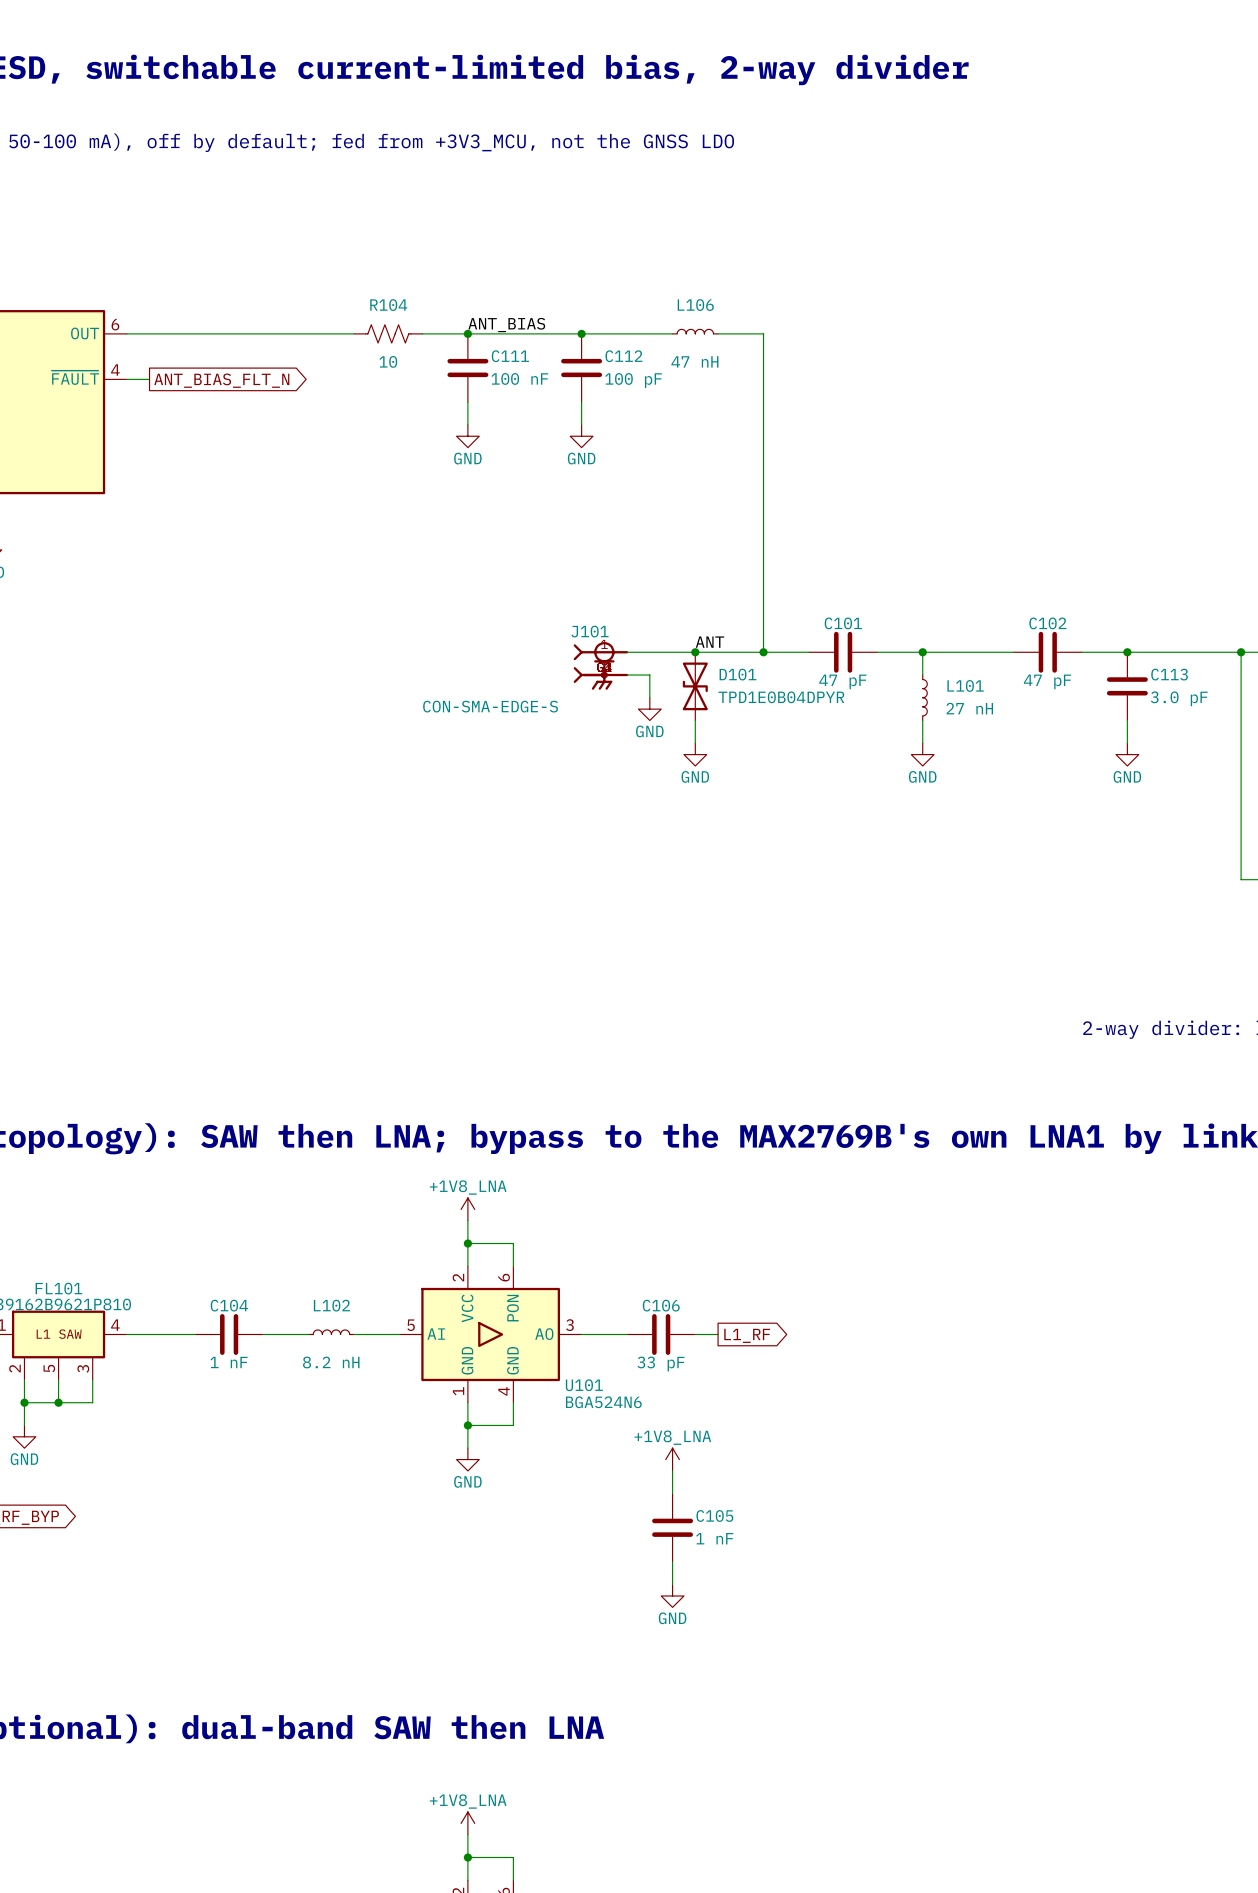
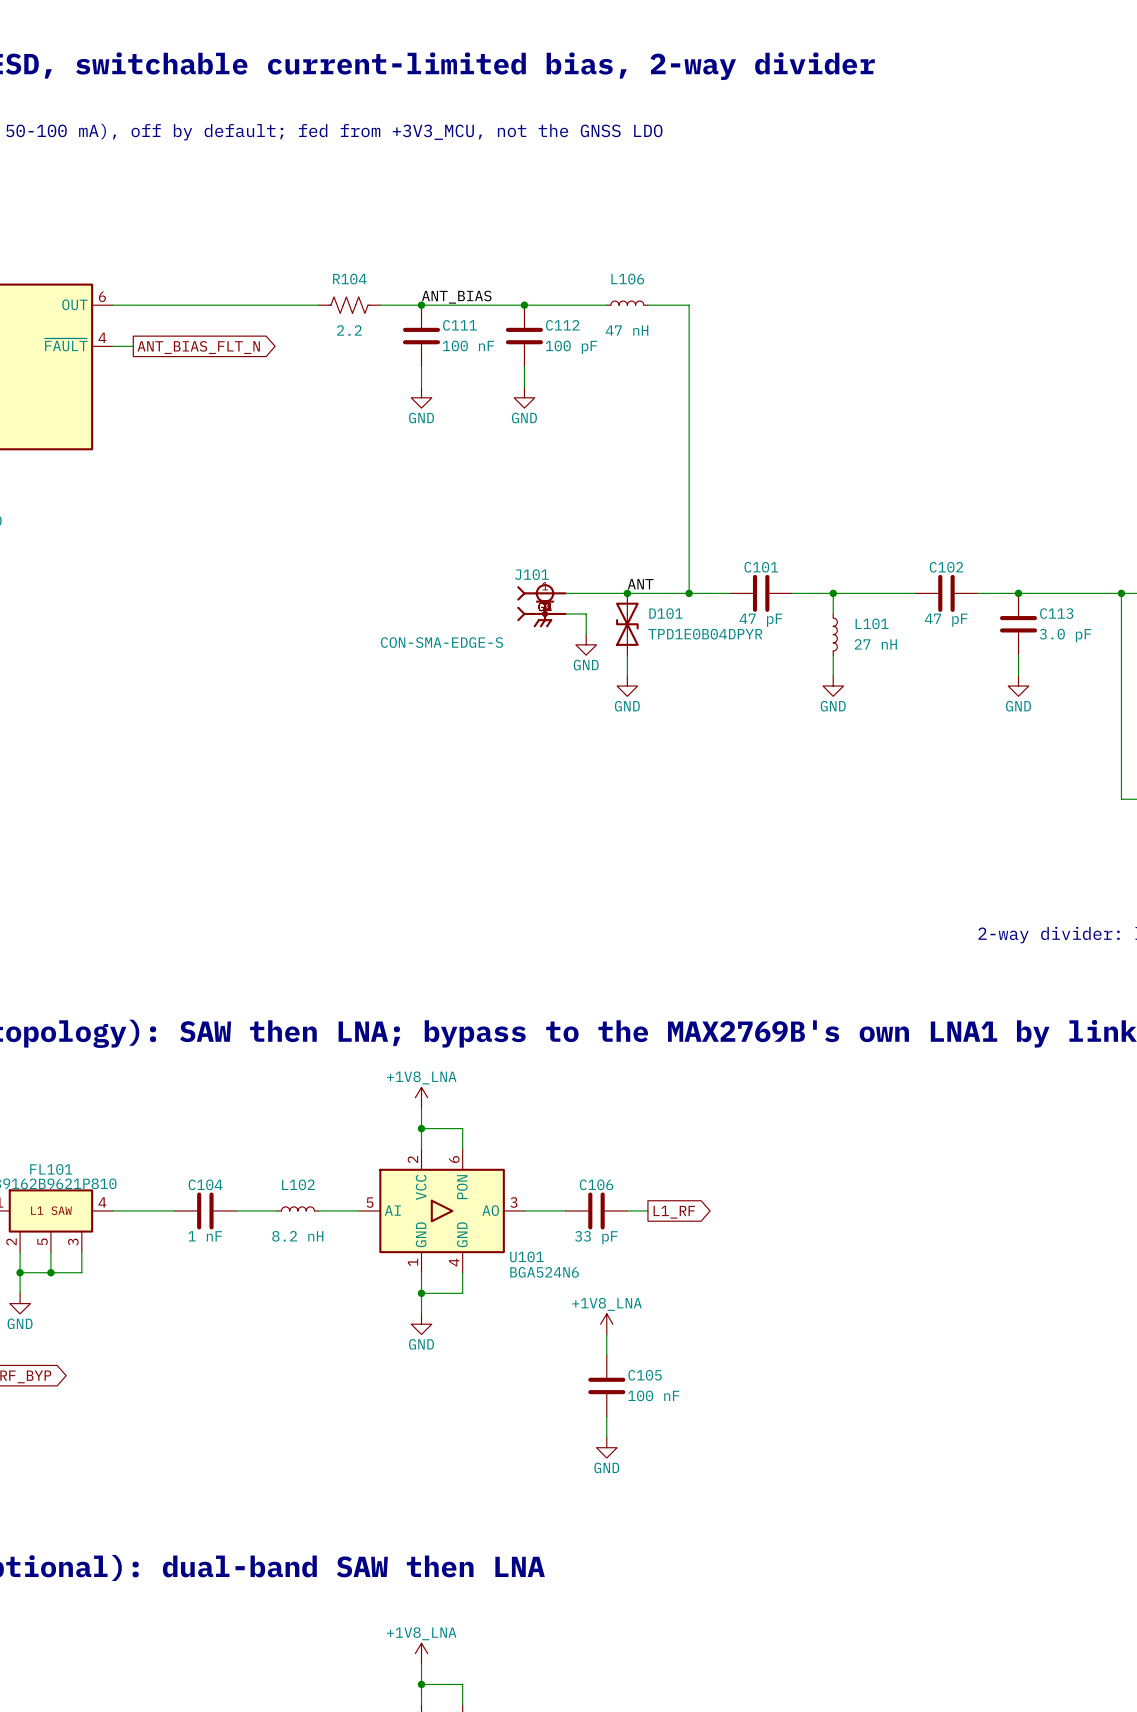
R104 value: 10 (388, 361) -> 2.2 (349, 330)
C105 value: 1 nF (714, 1538) -> 100 nF (653, 1395)

